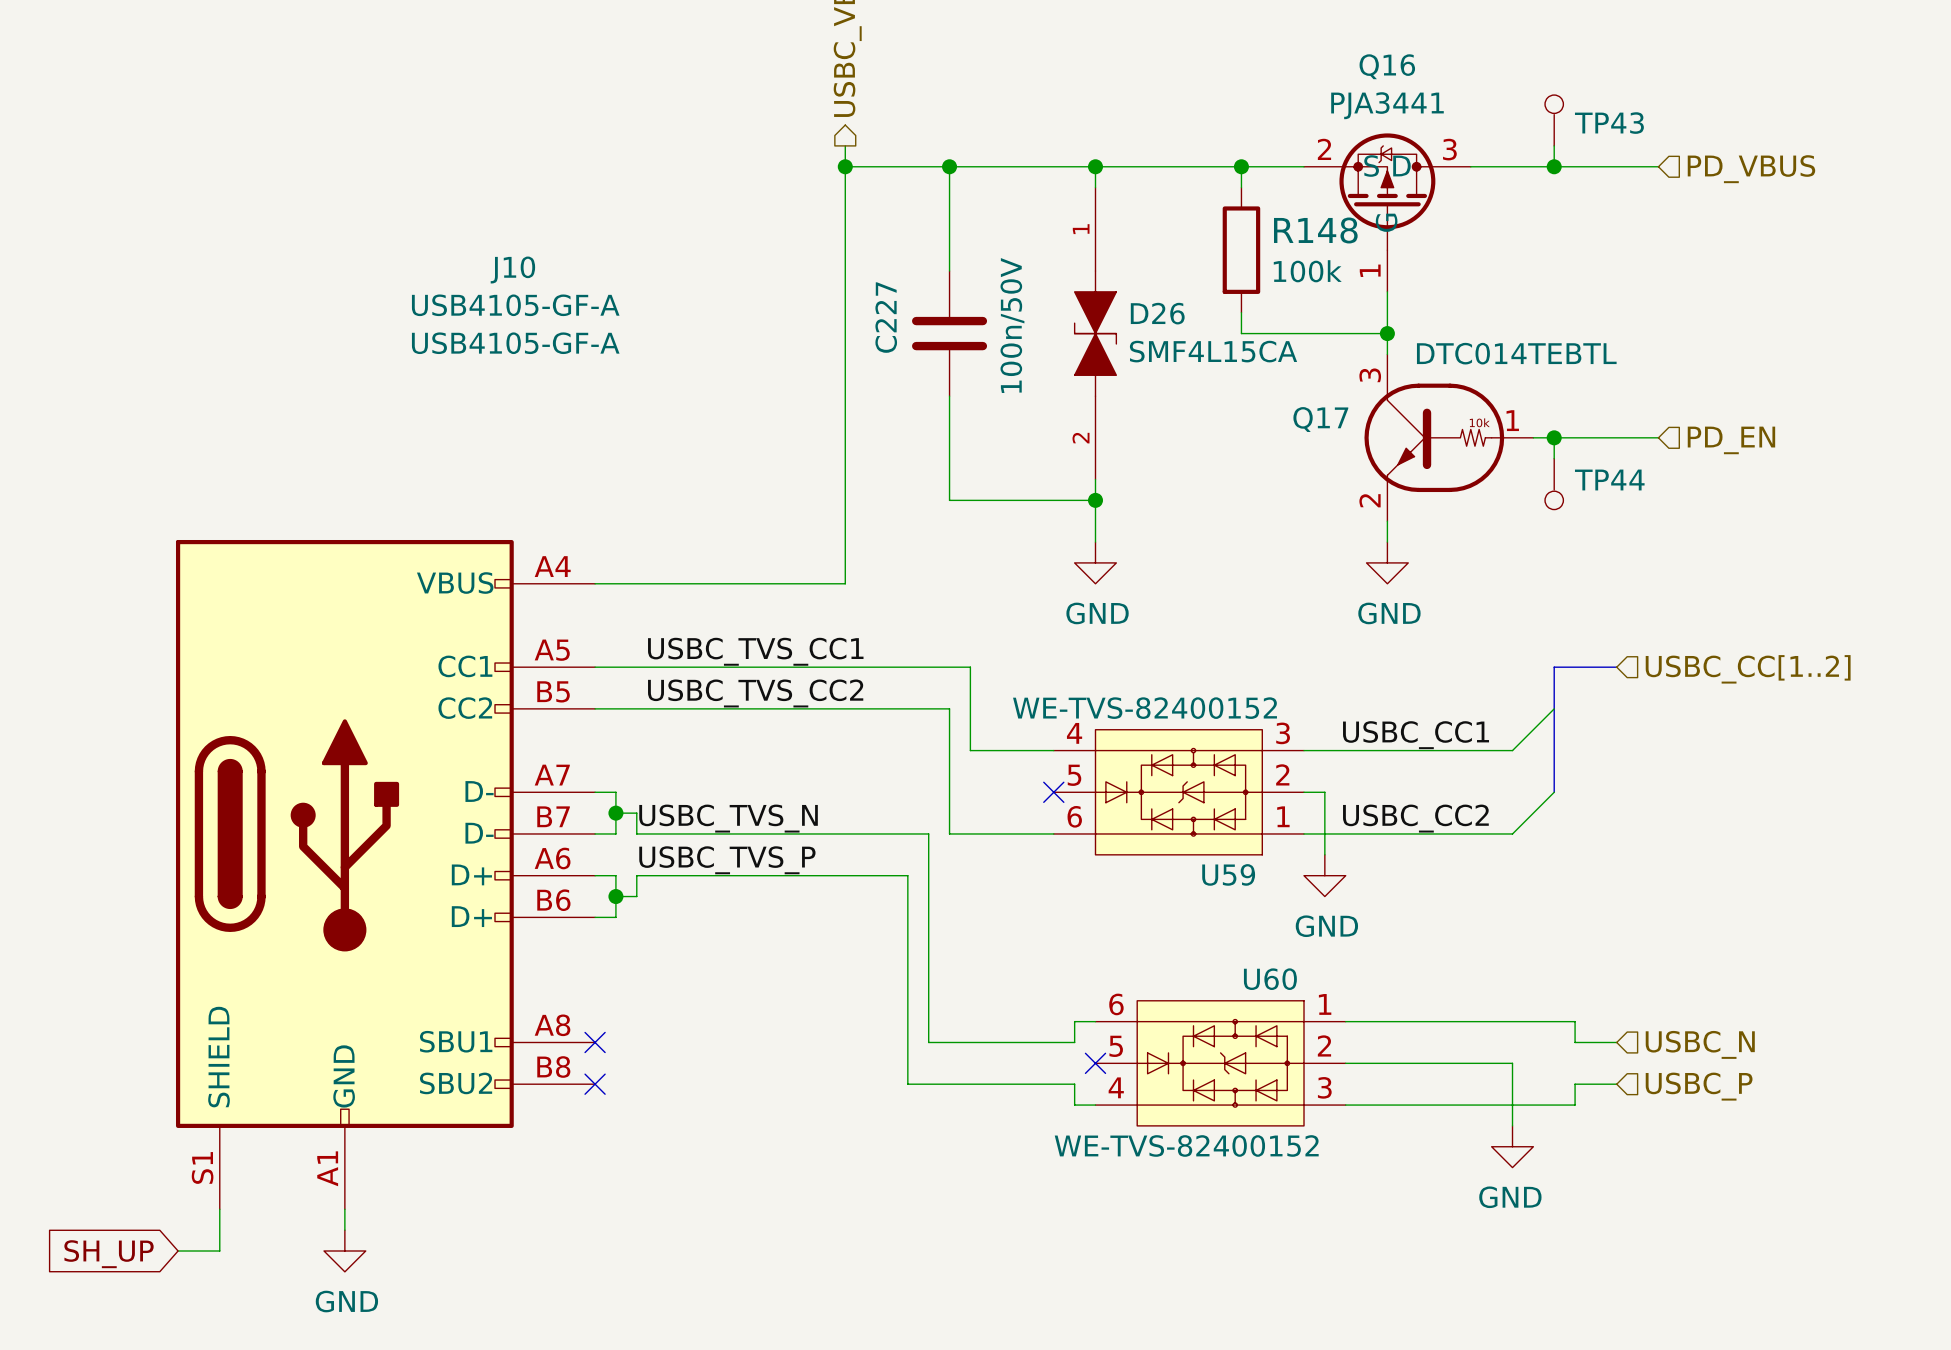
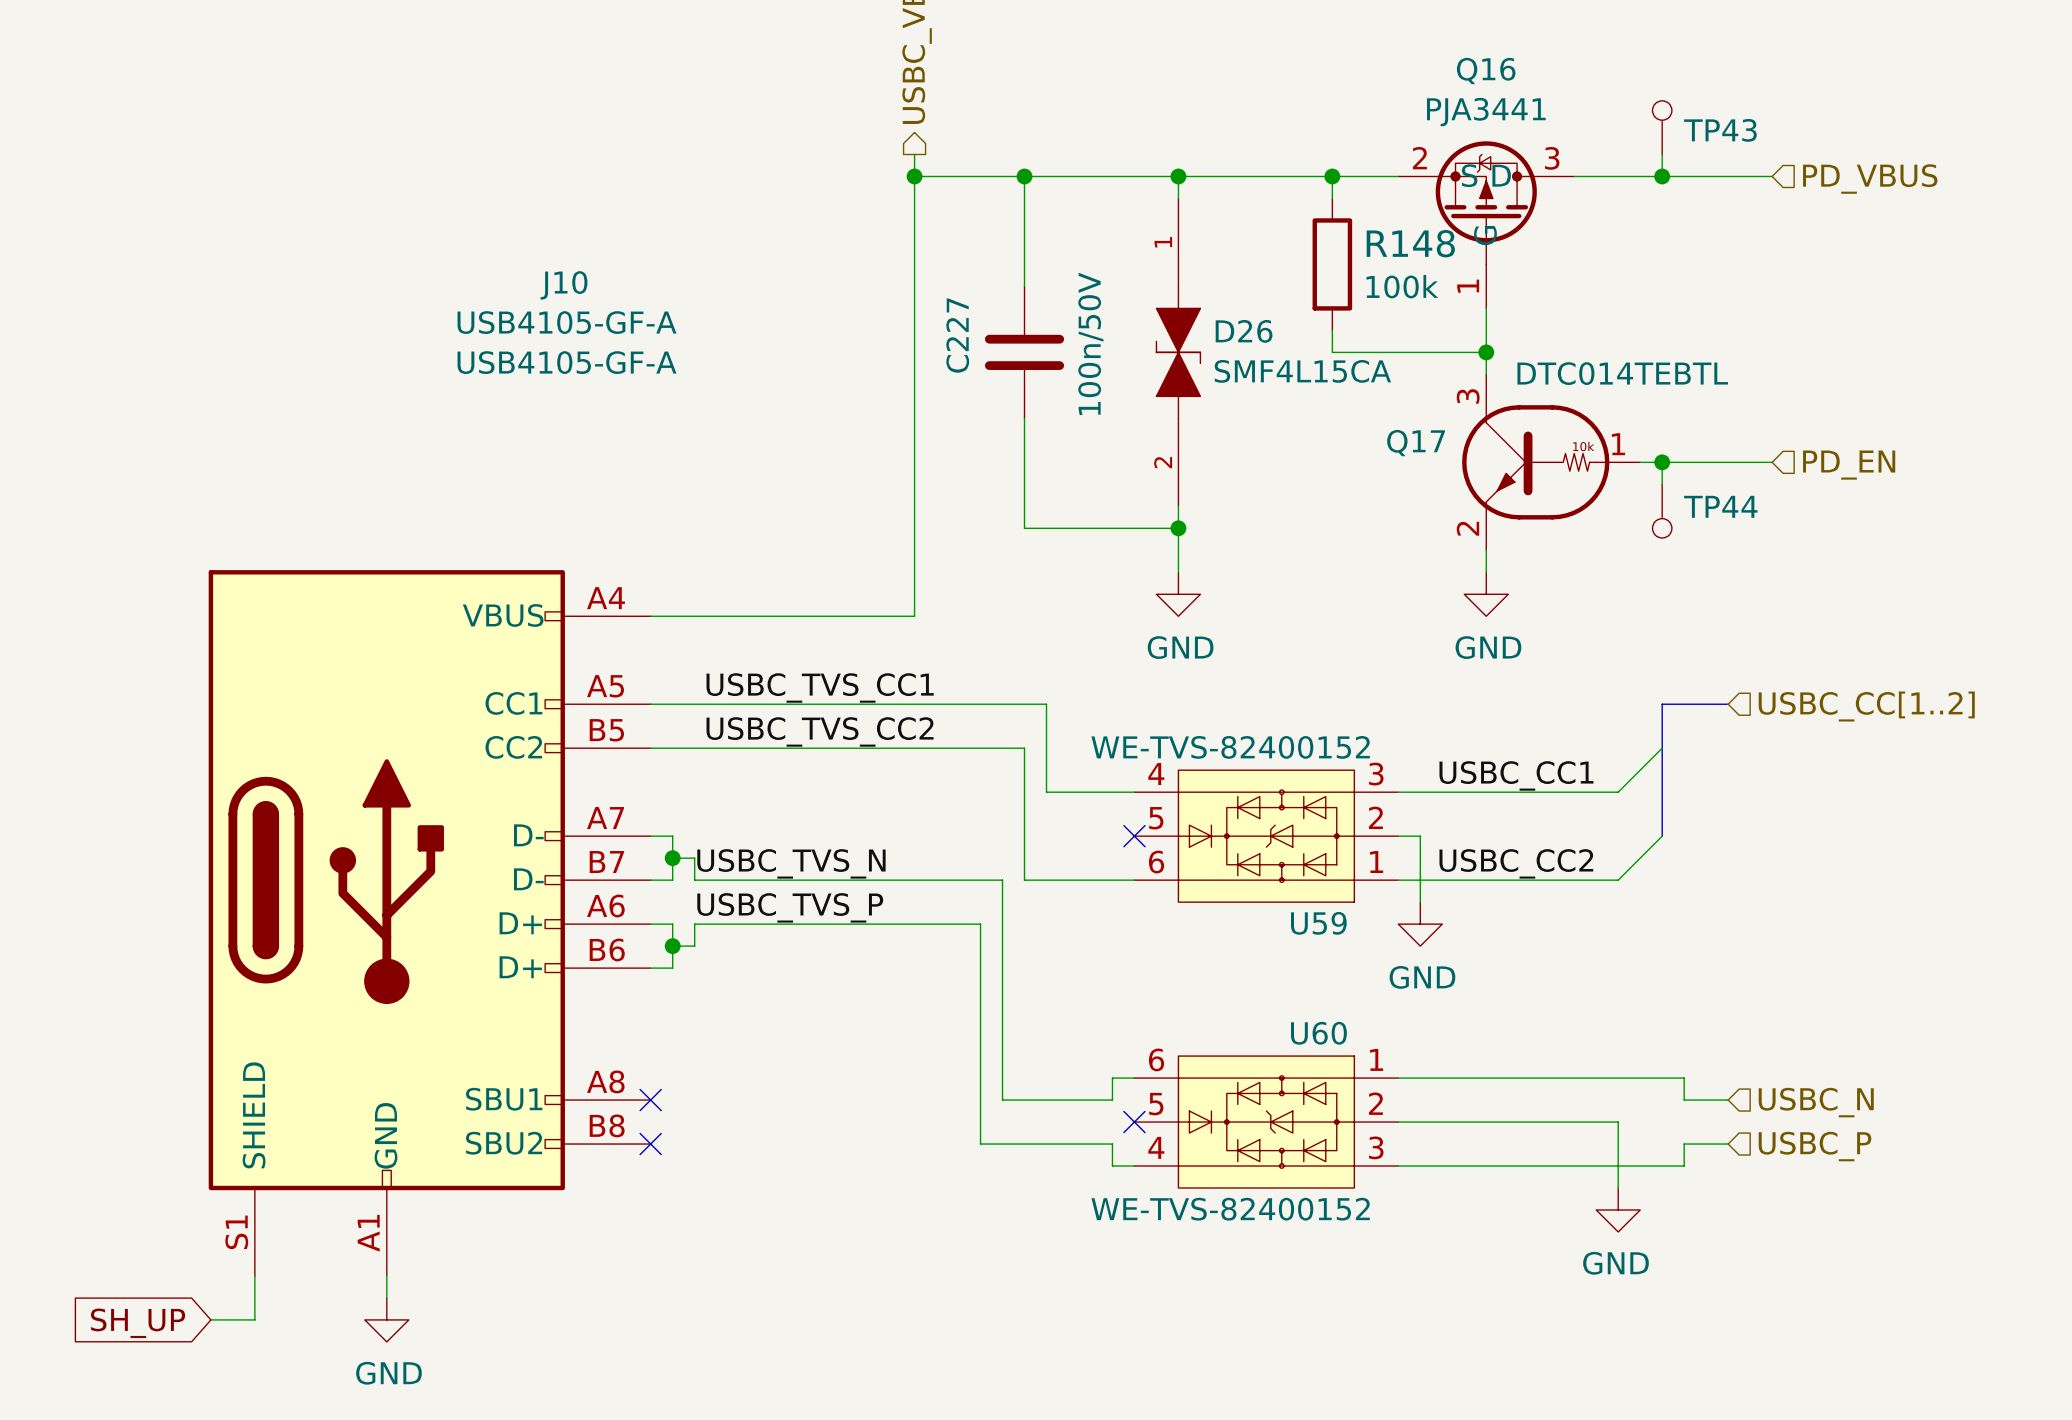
wire: (1095, 1021) (1074, 1021) (1074, 1042) (1032, 1042) -> (1134, 1078) (1112, 1078) (1112, 1100)
no-connect mark position: (1095, 1063) -> (1134, 1122)
U60 position: (1220, 1063) -> (1266, 1122)
wire: (1032, 1084) (1074, 1084) (1074, 1105) (1095, 1105) -> (1112, 1144) (1112, 1166) (1134, 1166)

